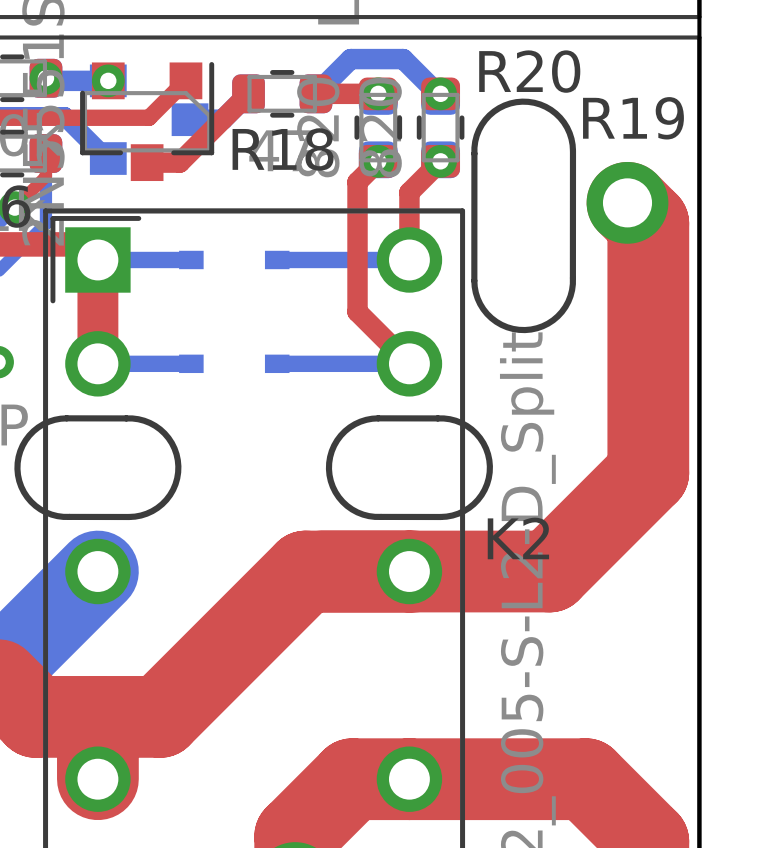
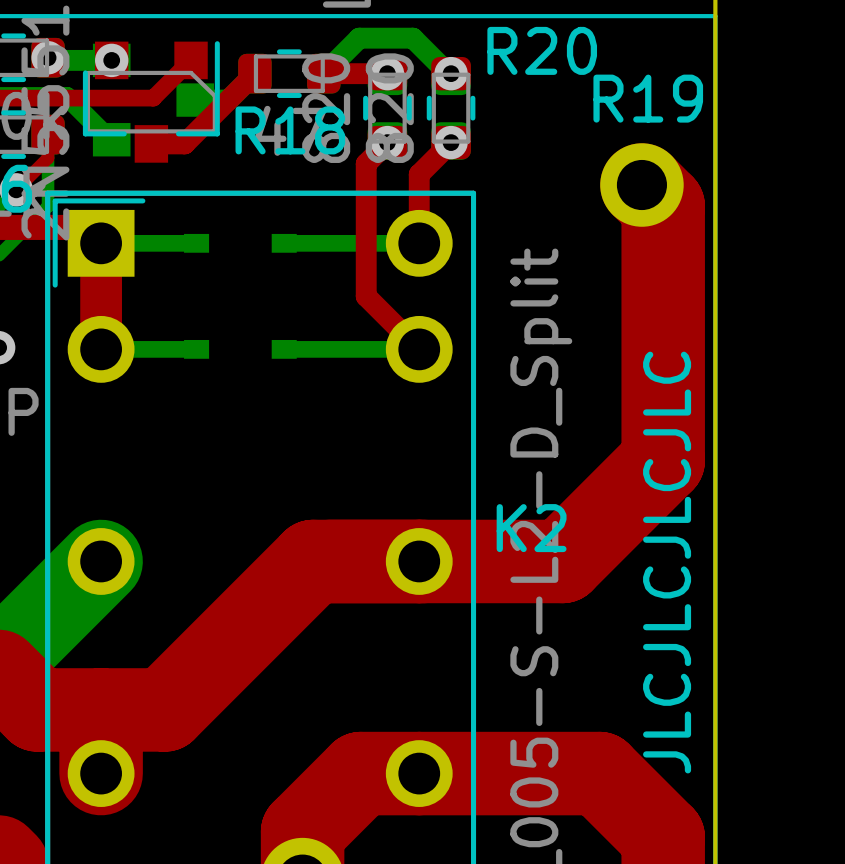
line: (572, 150) (572, 284) (570, 295) (561, 311) (548, 323) (531, 329) (507, 327) (487, 313) (480, 304) (474, 286) (474, 147) (476, 135) (485, 119) (499, 108) (516, 102) (534, 102) (545, 106) (560, 117) (569, 133) (572, 150) -> none
line: (66, 418) (132, 418) (144, 420) (160, 429) (171, 443) (177, 460) (175, 484) (166, 499) (152, 511) (129, 516) (63, 516) (51, 514) (35, 505) (23, 492) (19, 481) (17, 469) (20, 451) (25, 440) (38, 427) (54, 419) (66, 418) -> none
line: (378, 418) (443, 418) (455, 420) (471, 429) (483, 443) (489, 460) (487, 484) (477, 499) (463, 511) (440, 516) (374, 516) (363, 514) (347, 505) (335, 492) (330, 481) (328, 469) (331, 451) (337, 440) (349, 427) (366, 419) (378, 418) -> none
text: none -> JLCJLCJLCJLC (667, 562)

